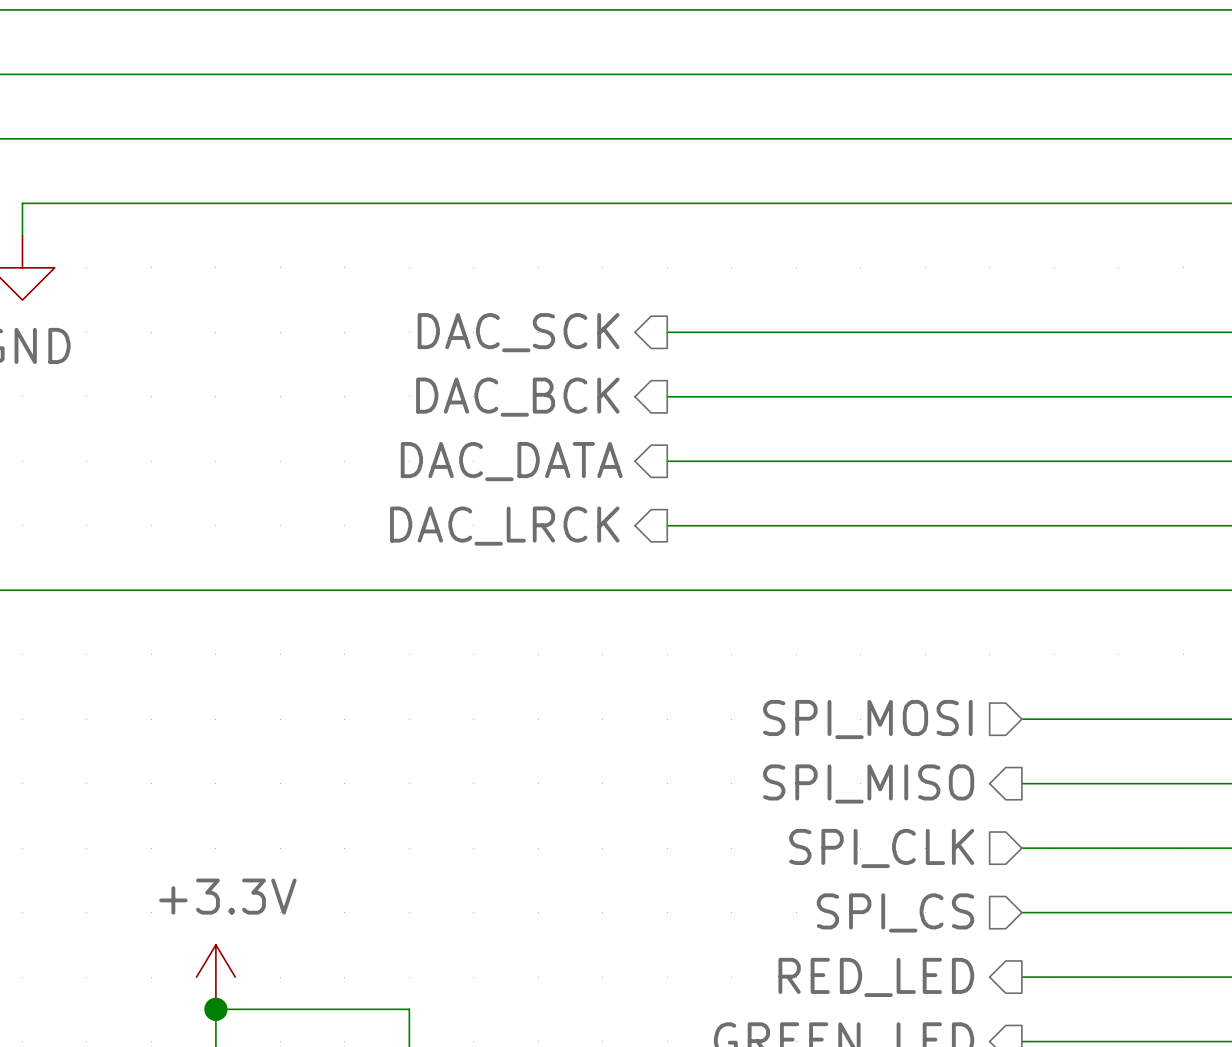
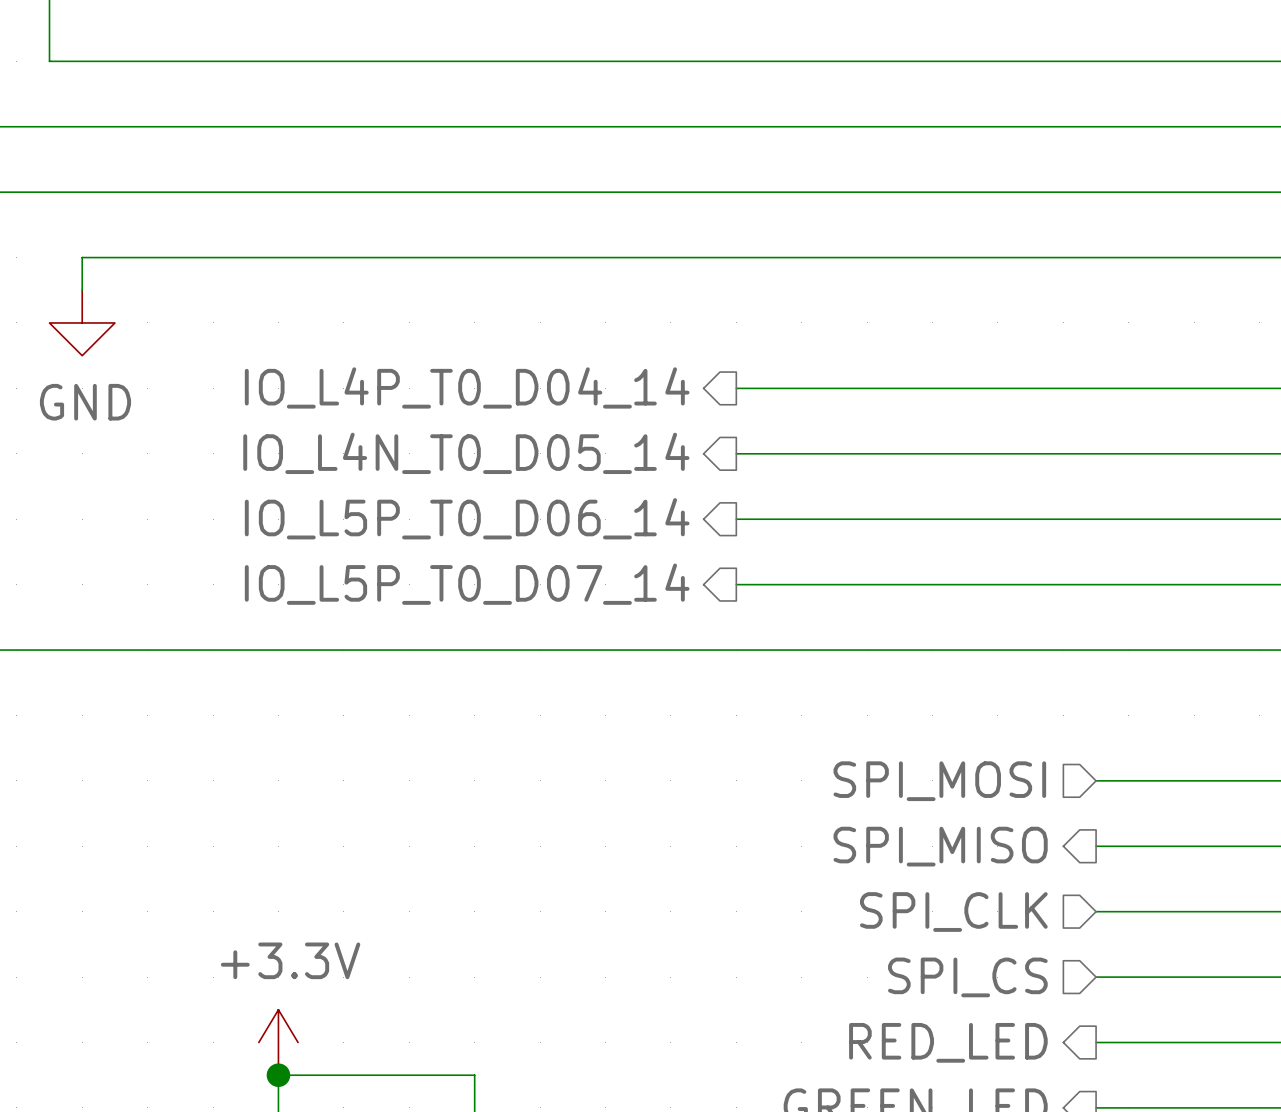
hierarchical label: DAC_SCK (518, 332) -> IO_L4P_T0_D04_14 (467, 387)
hierarchical label: DAC_BCK (517, 397) -> IO_L4N_T0_D05_14 (466, 453)
hierarchical label: DAC_DATA (511, 461) -> IO_L5P_T0_D06_14 (467, 518)
hierarchical label: DAC_LRCK (504, 526) -> IO_L5P_T0_D07_14 (467, 584)

